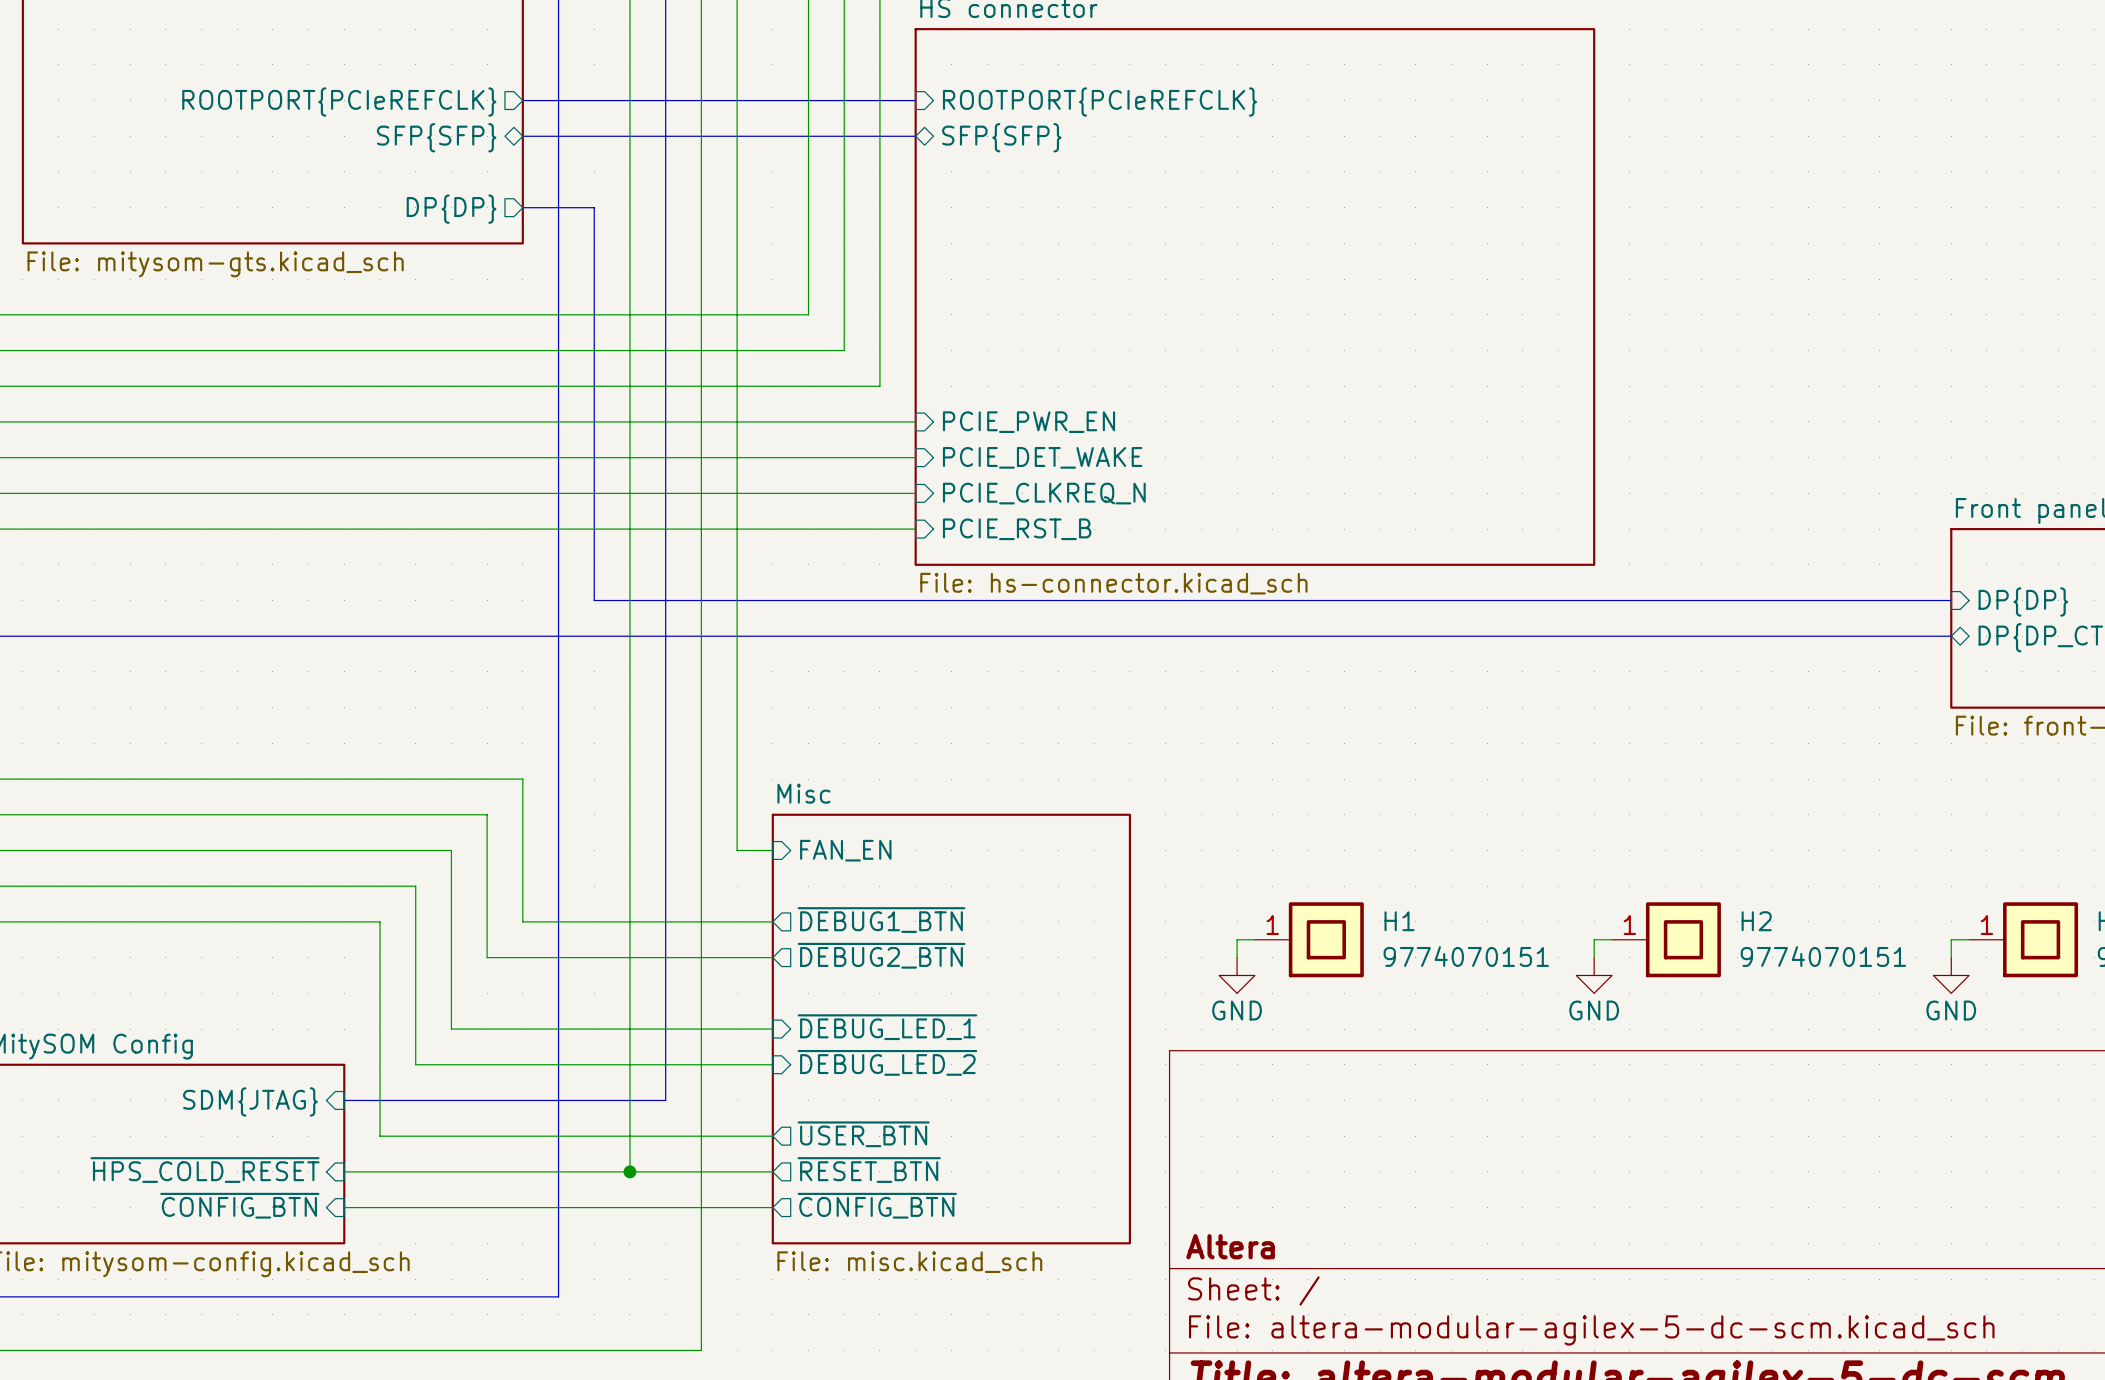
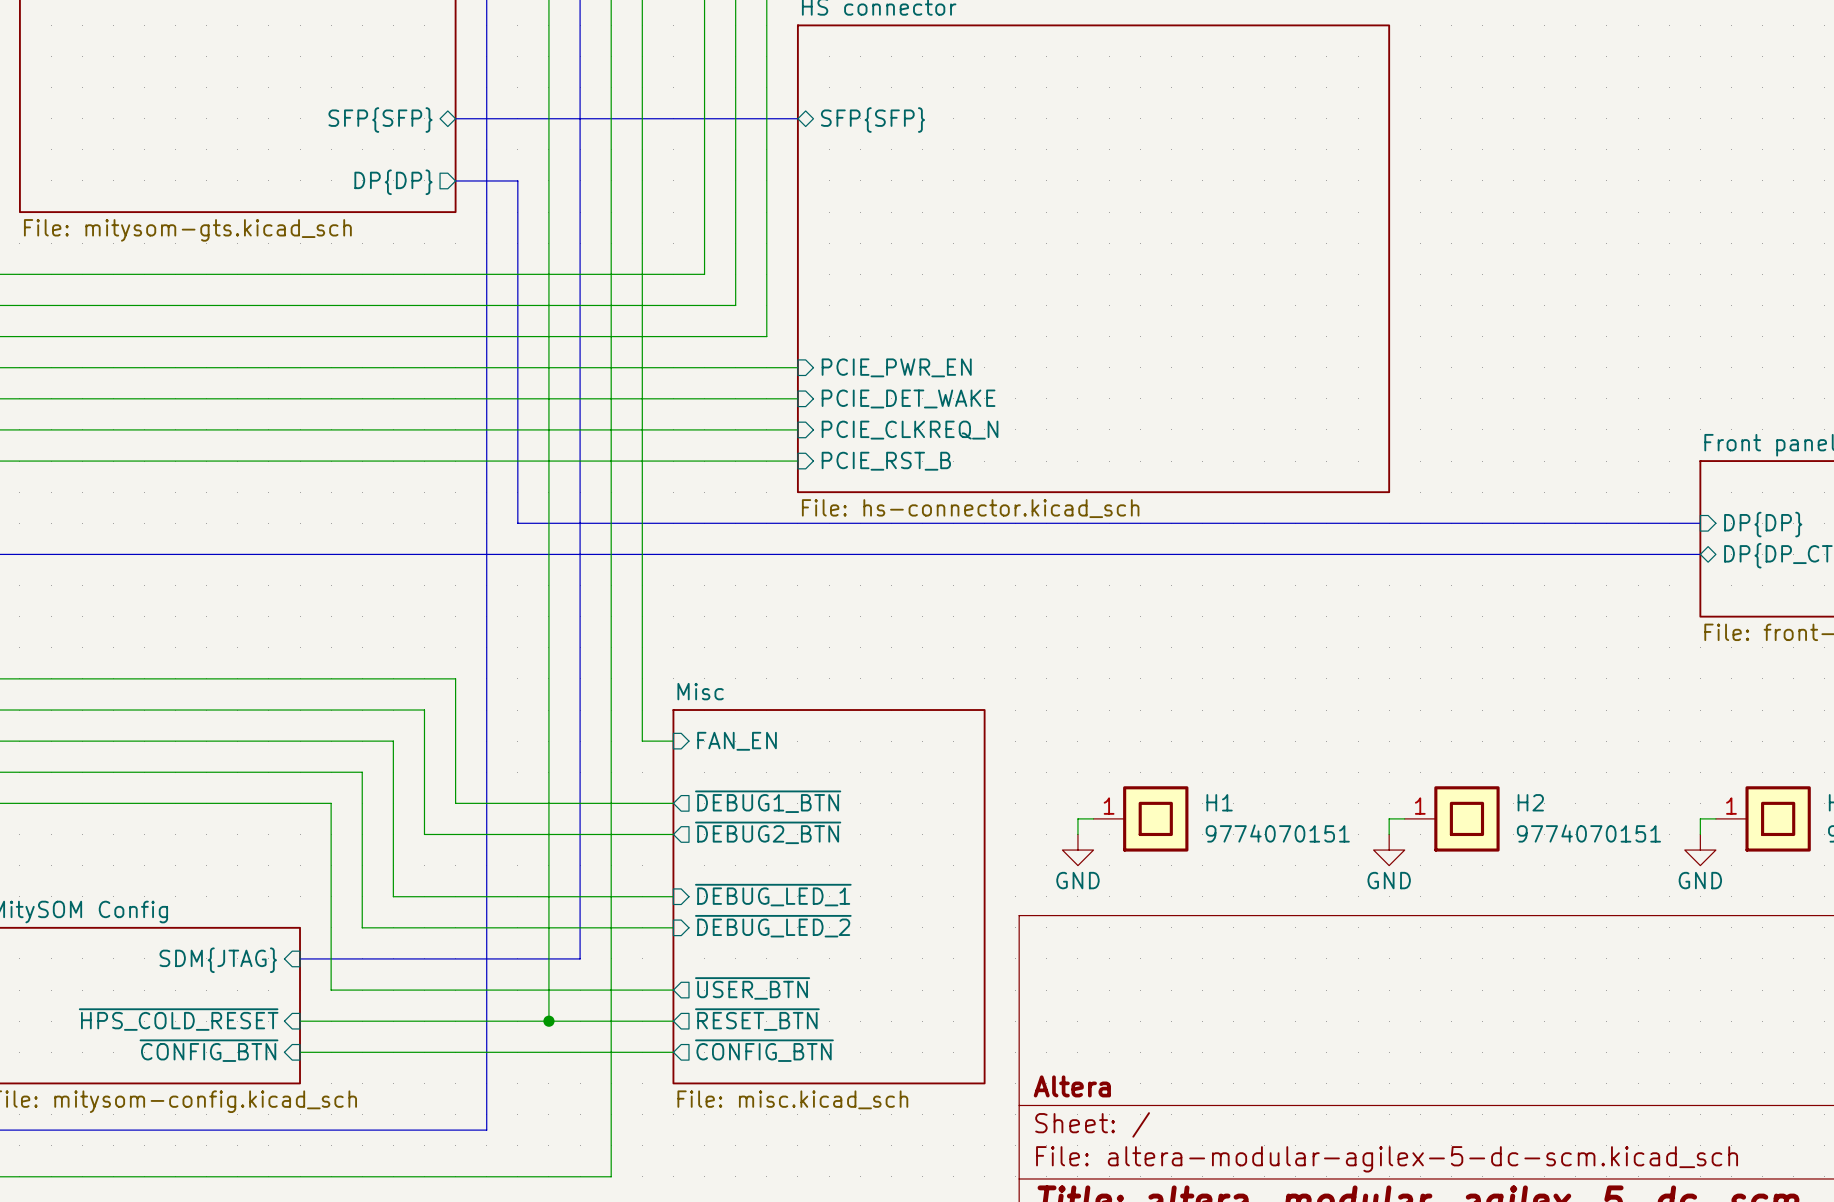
bus: (522, 100) (915, 100) -> none
sheet pin: ROOTPORT{PCIeREFCLK} (339, 102) -> none
sheet pin: ROOTPORT{PCIeREFCLK} (1100, 102) -> none

